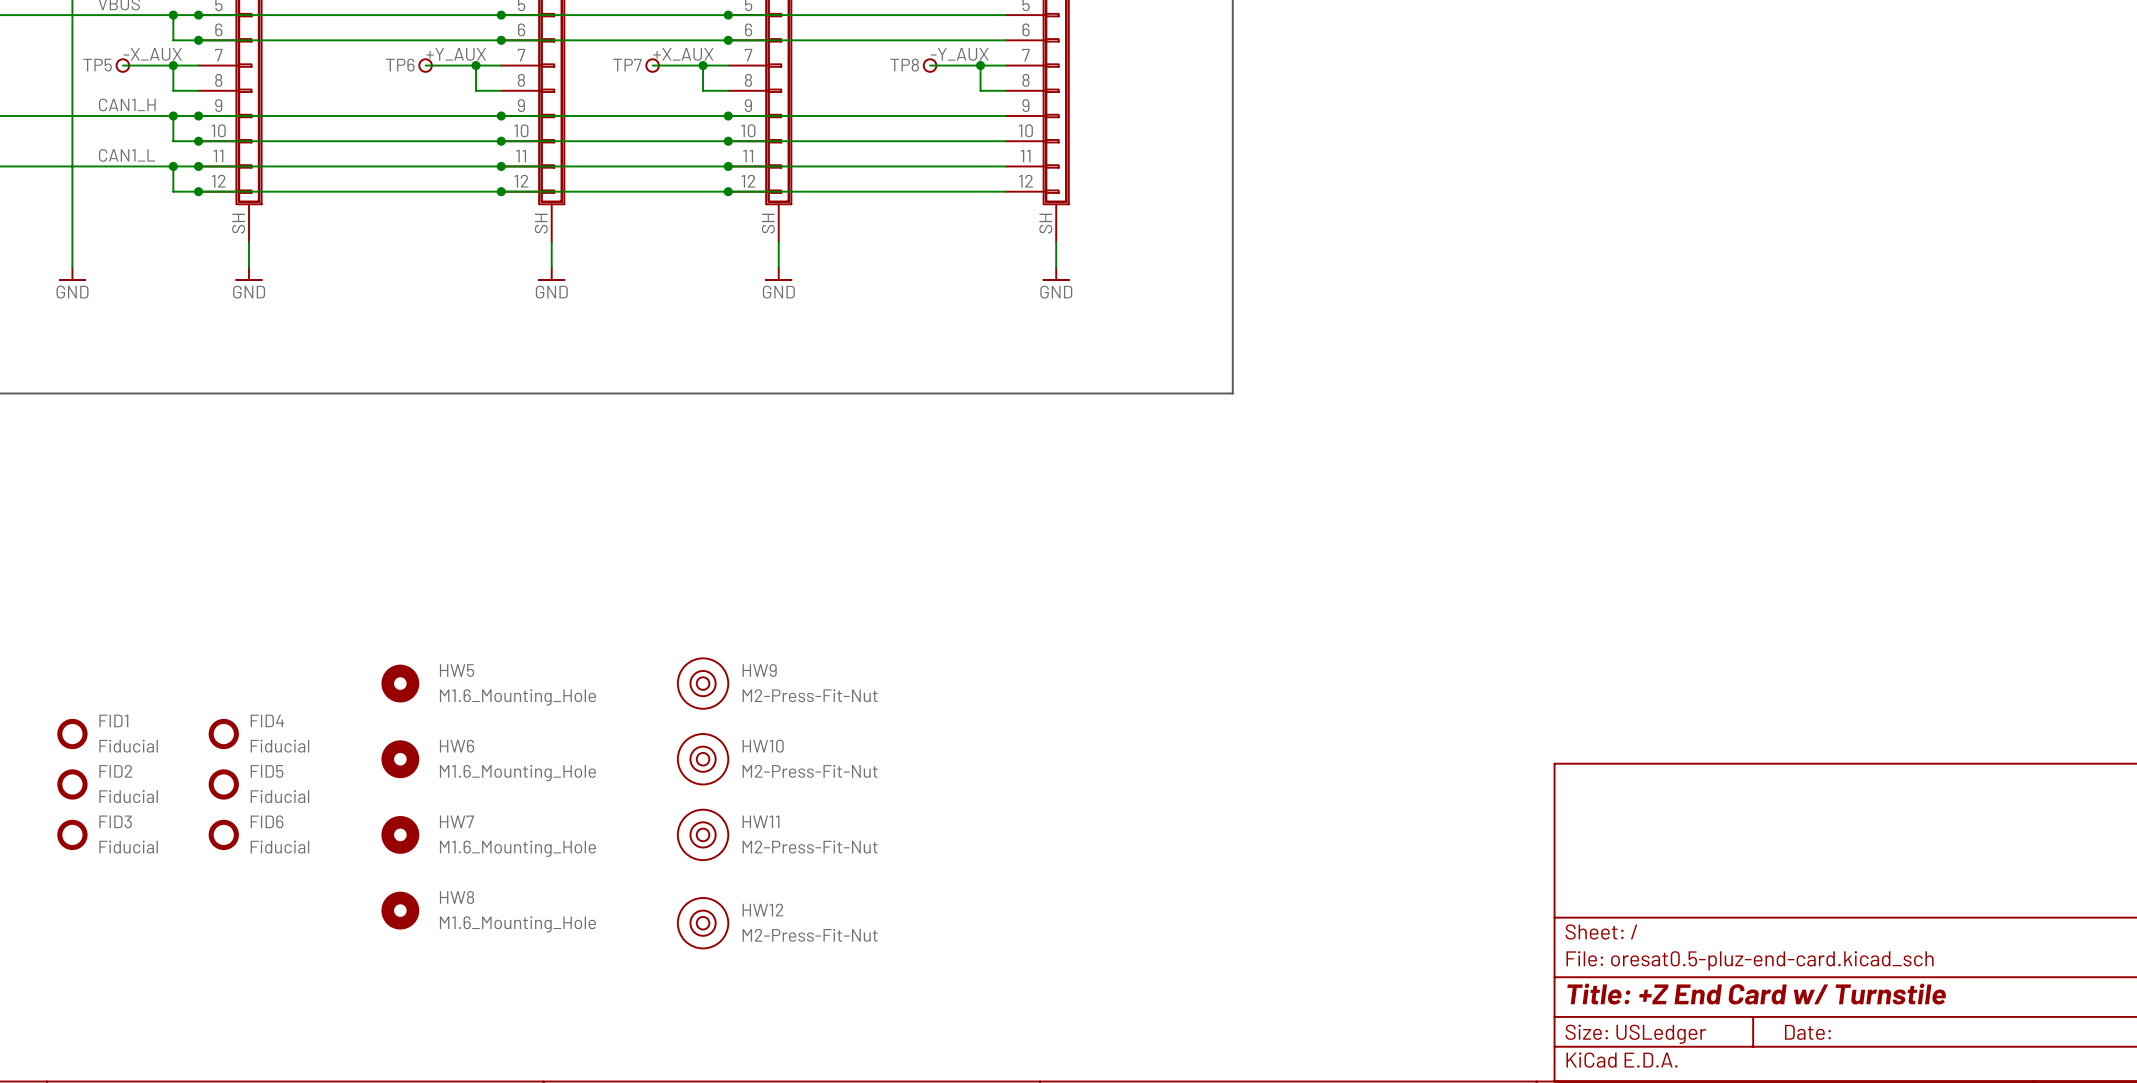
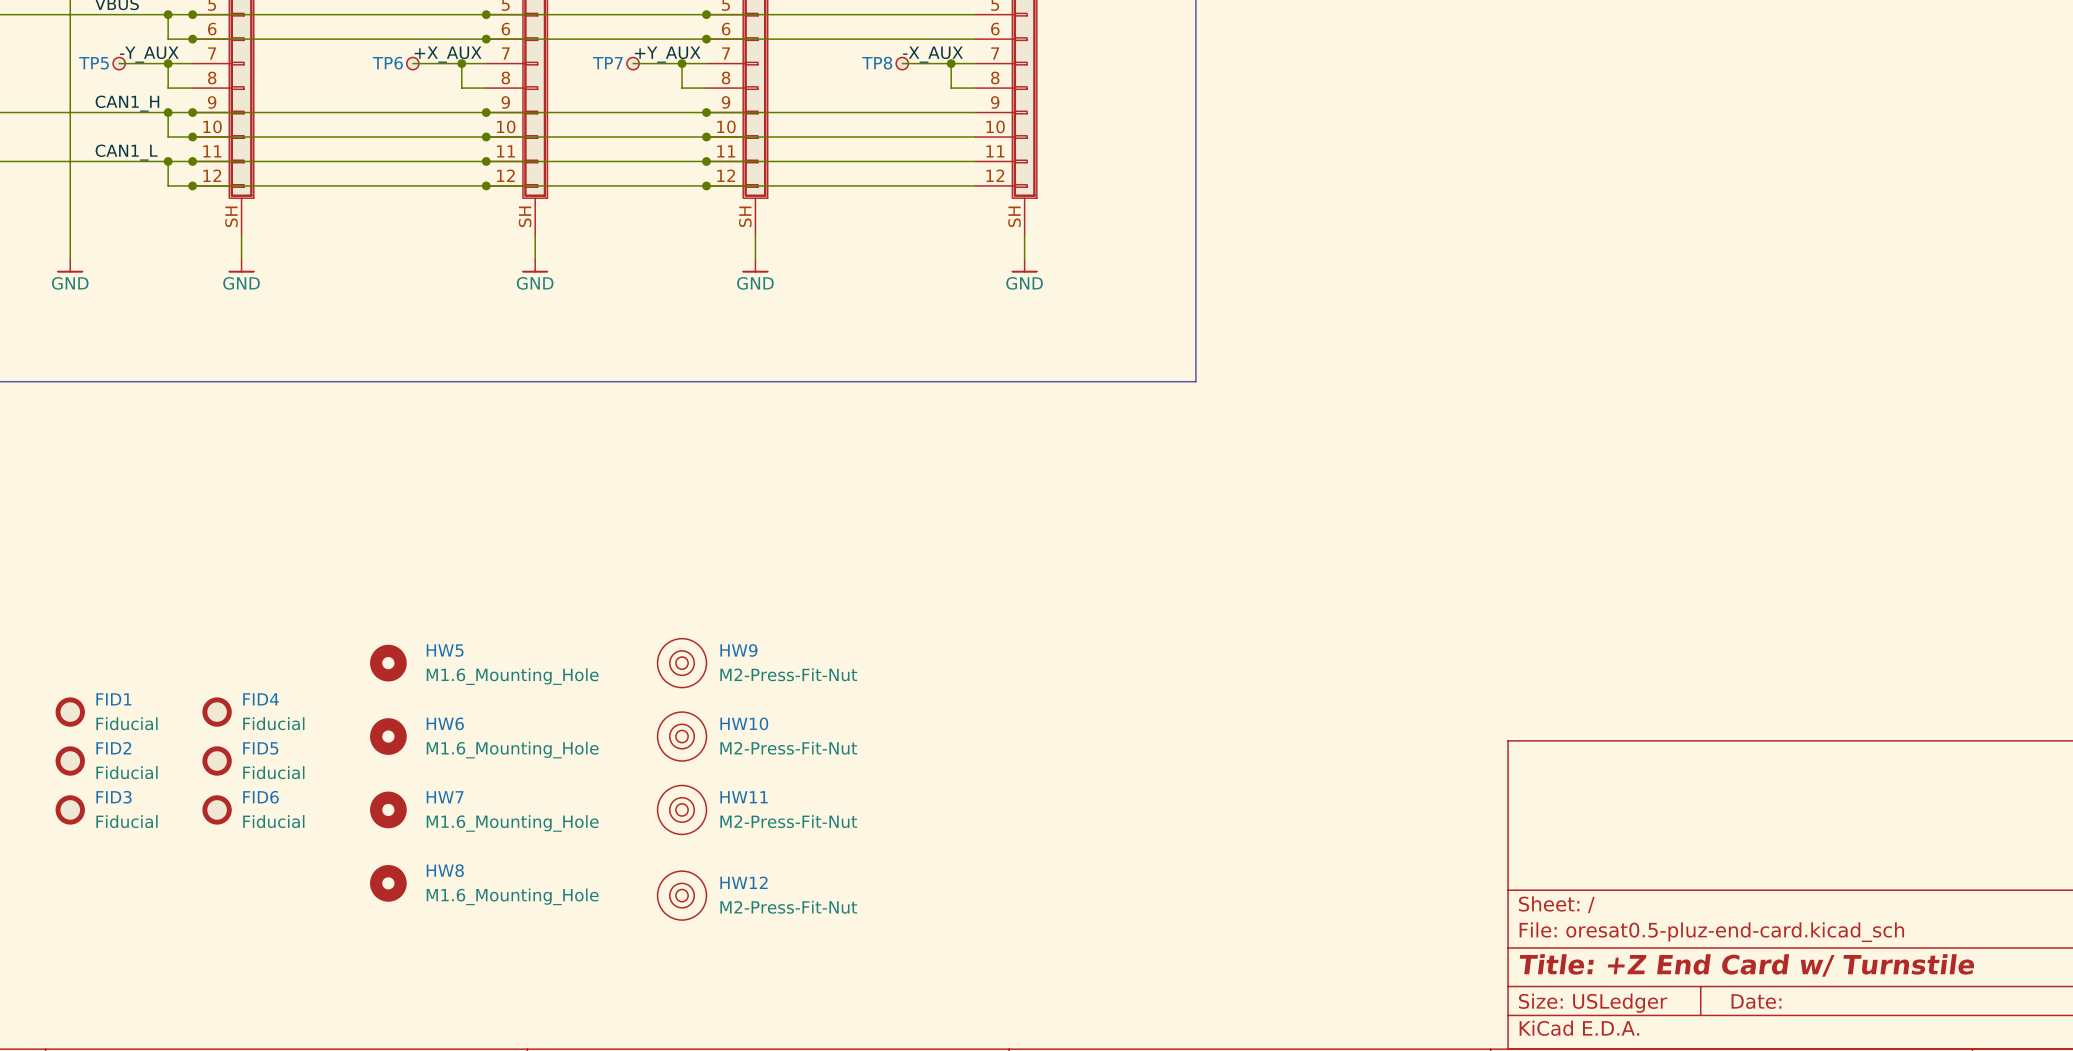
label: -X_AUX (152, 54) -> -Y_AUX (149, 54)
label: +Y_AUX (456, 54) -> +X_AUX (448, 54)
label: +X_AUX (683, 54) -> +Y_AUX (667, 54)
label: -Y_AUX (959, 54) -> -X_AUX (933, 54)

